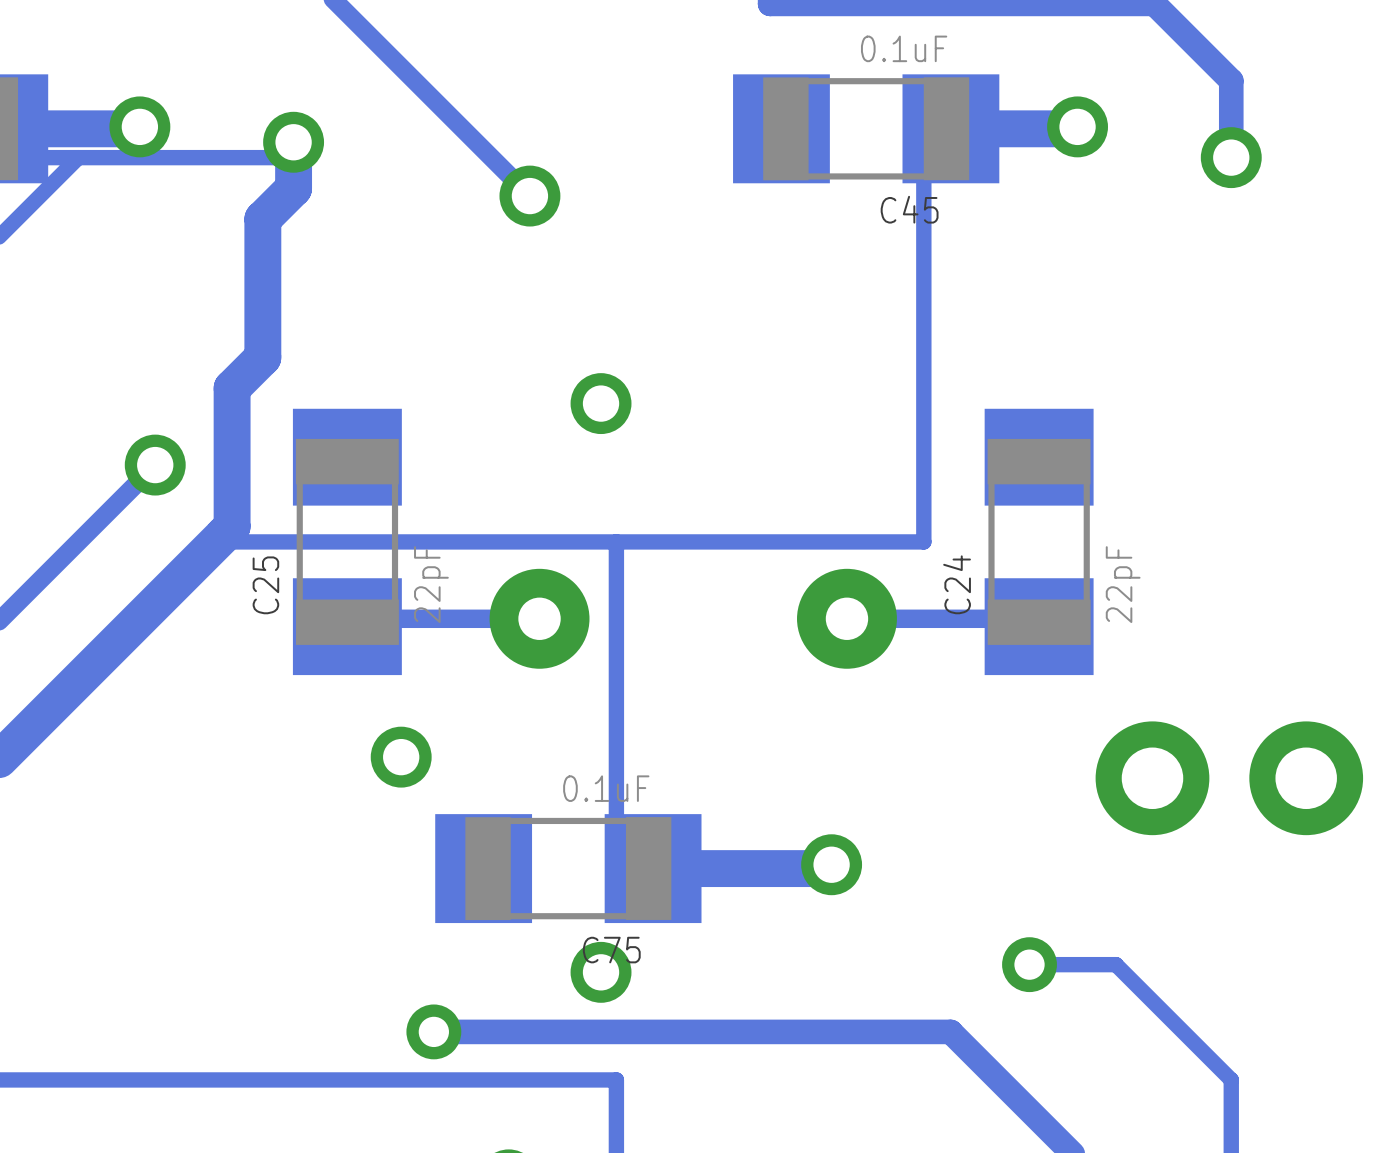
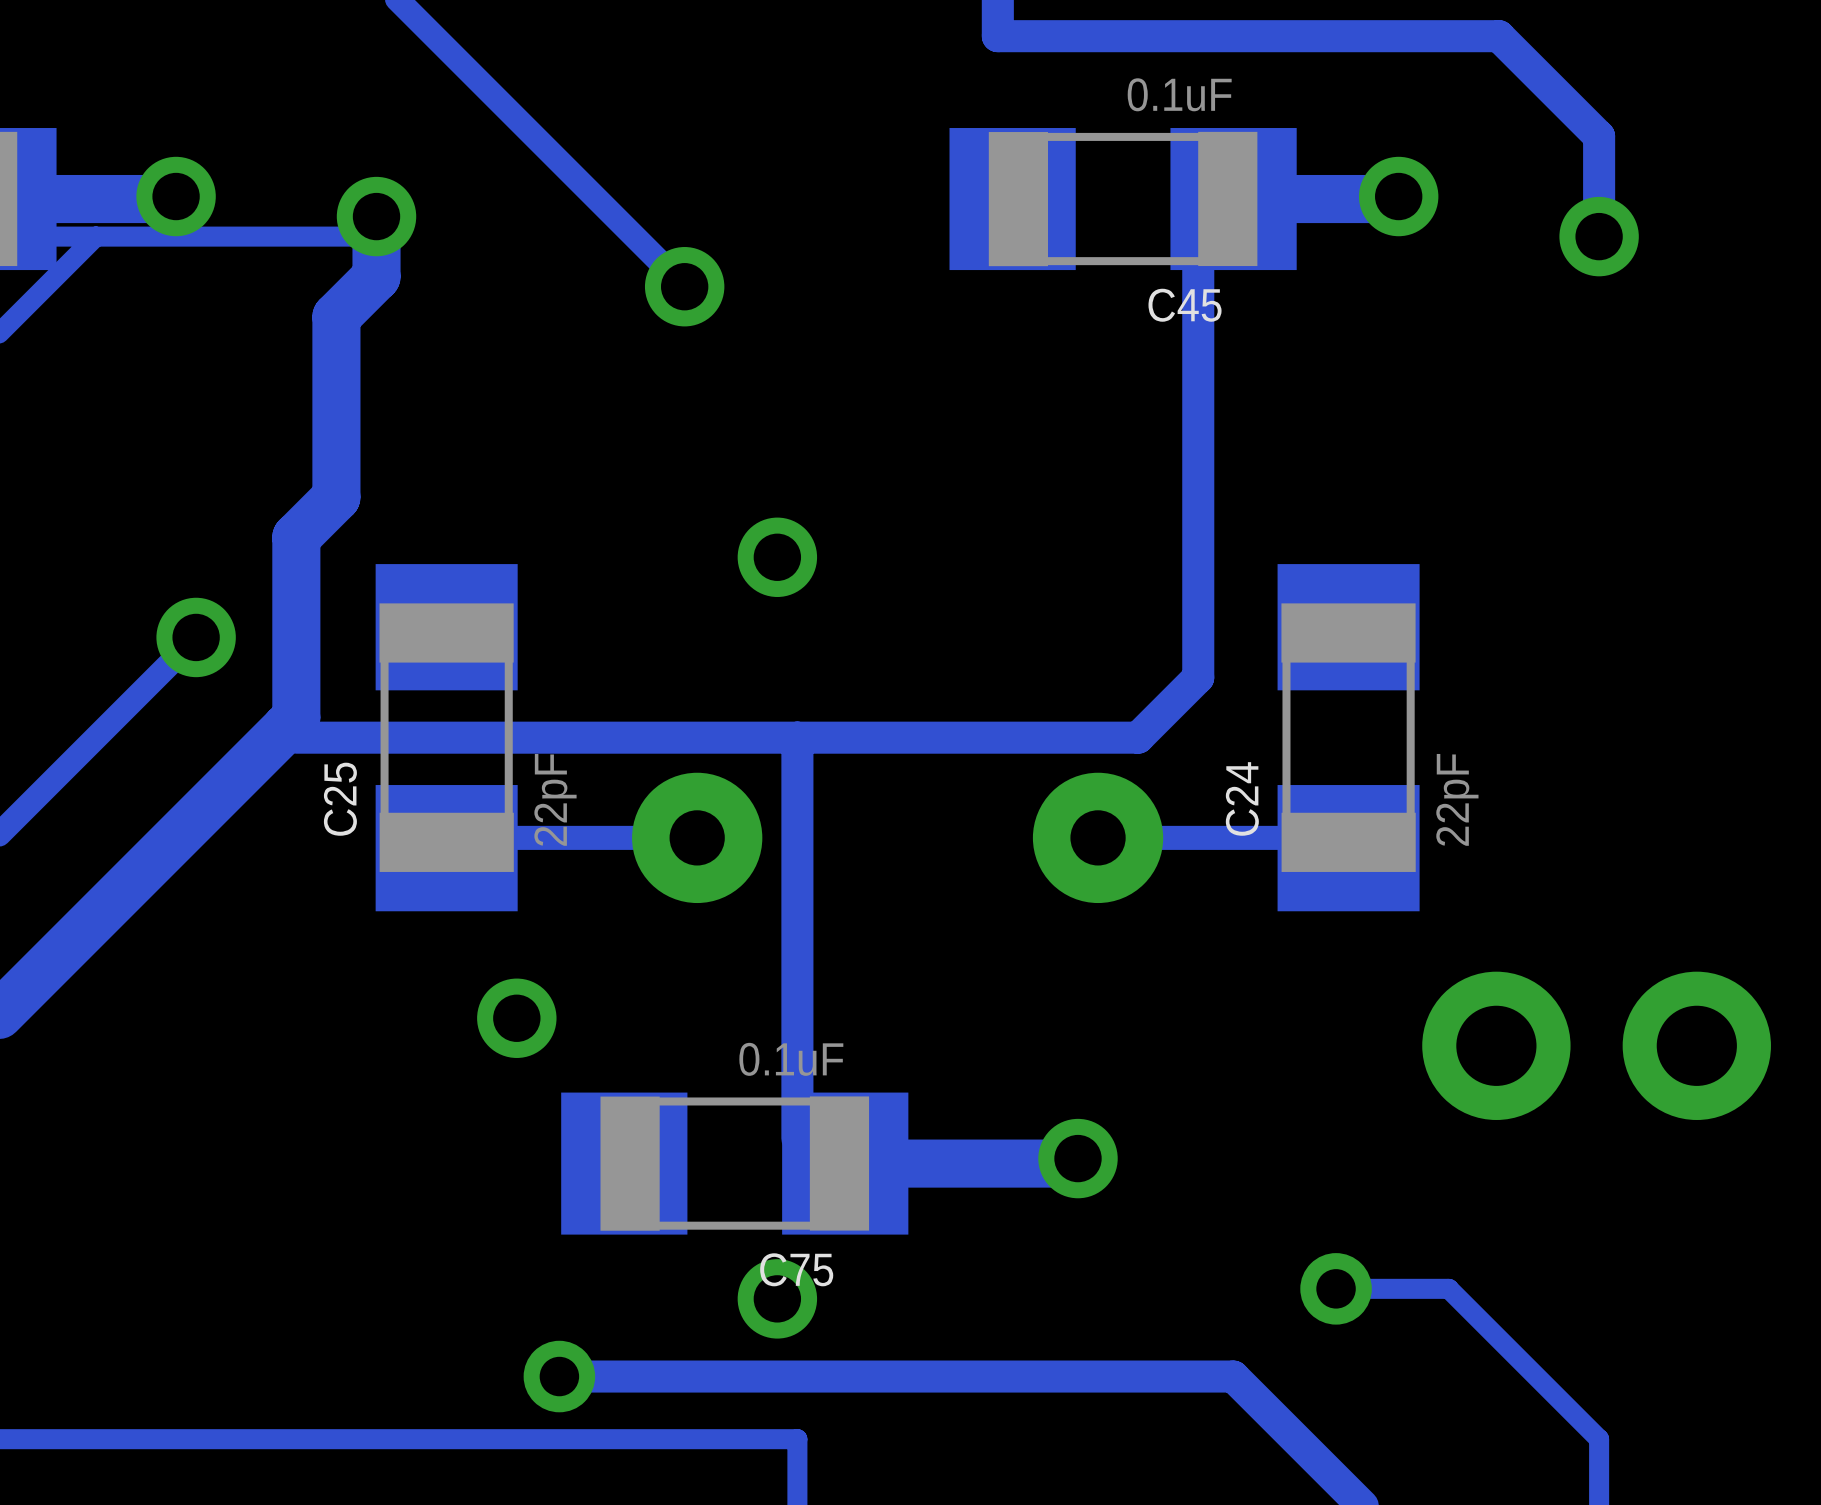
track width: thin (923, 157) (923, 495) -> thick (1198, 236) (1198, 677)
track: (923, 495) (923, 541) (877, 541) -> (1198, 677) (1138, 737)
track width: thin (616, 541) (616, 849) -> thick (797, 737) (797, 1138)
track width: thin (877, 541) (232, 541) -> thick (1138, 737) (296, 737)

